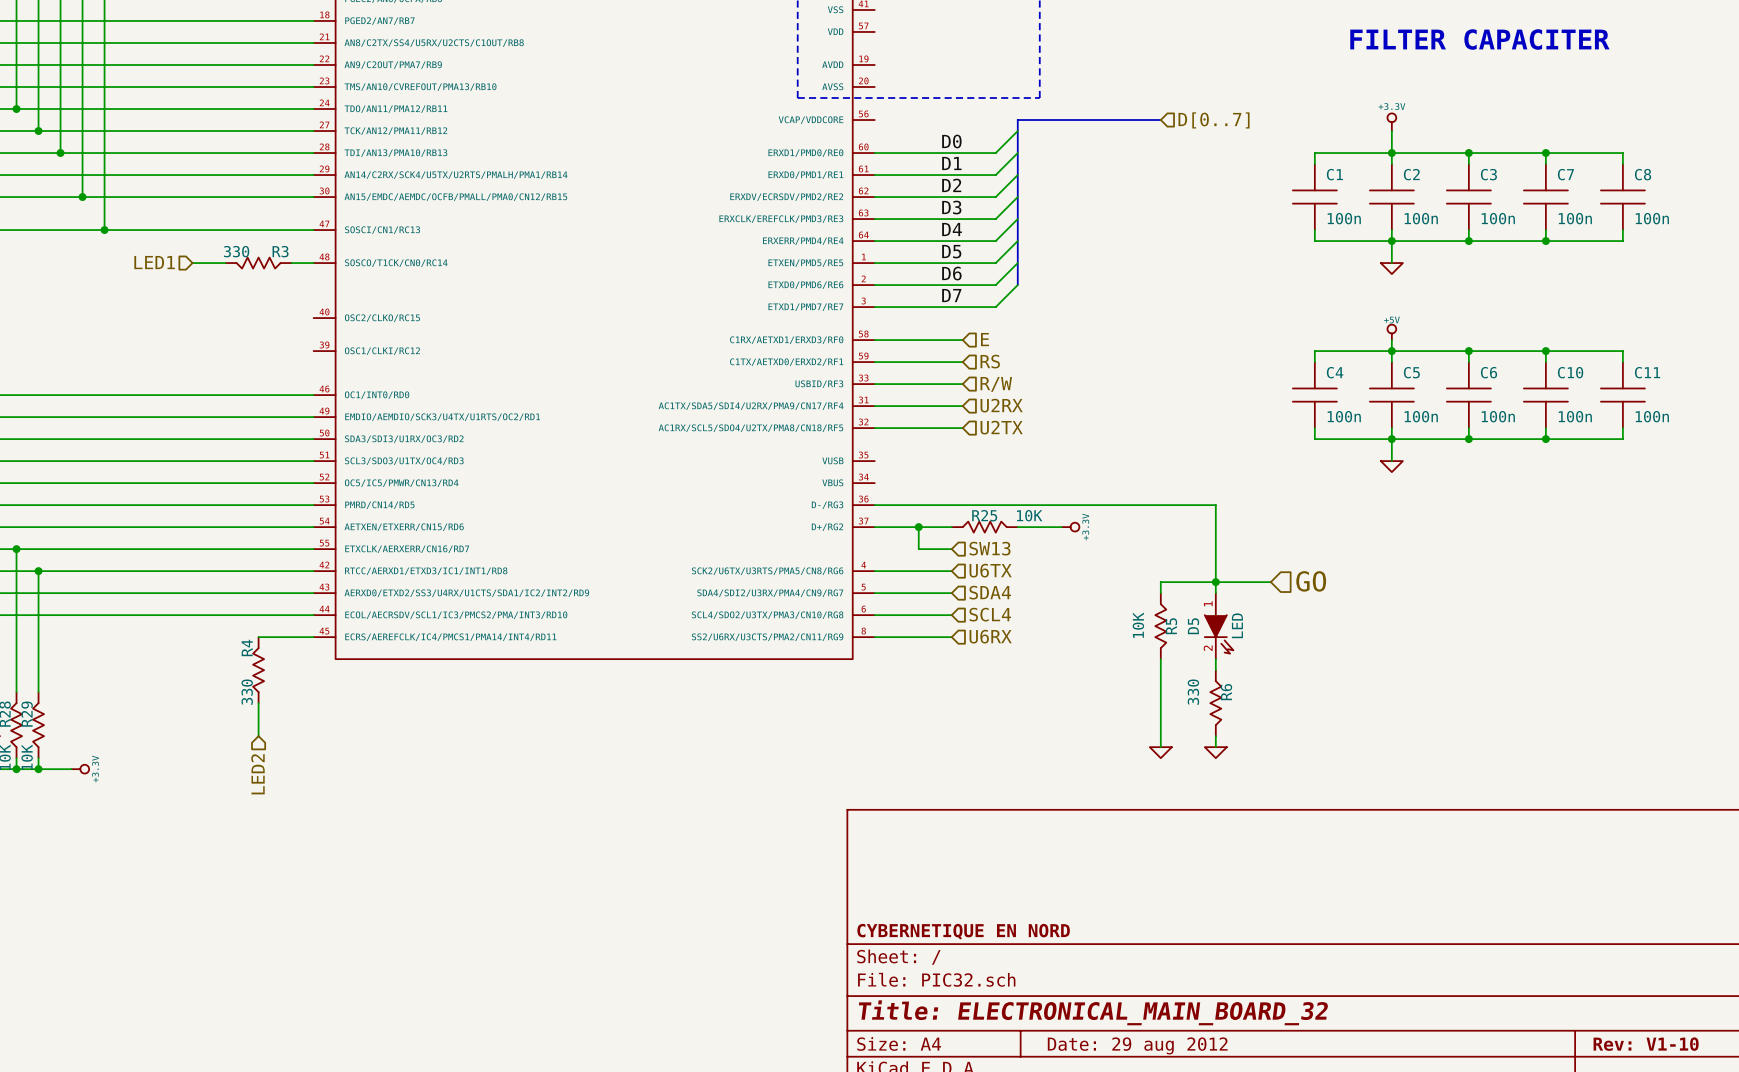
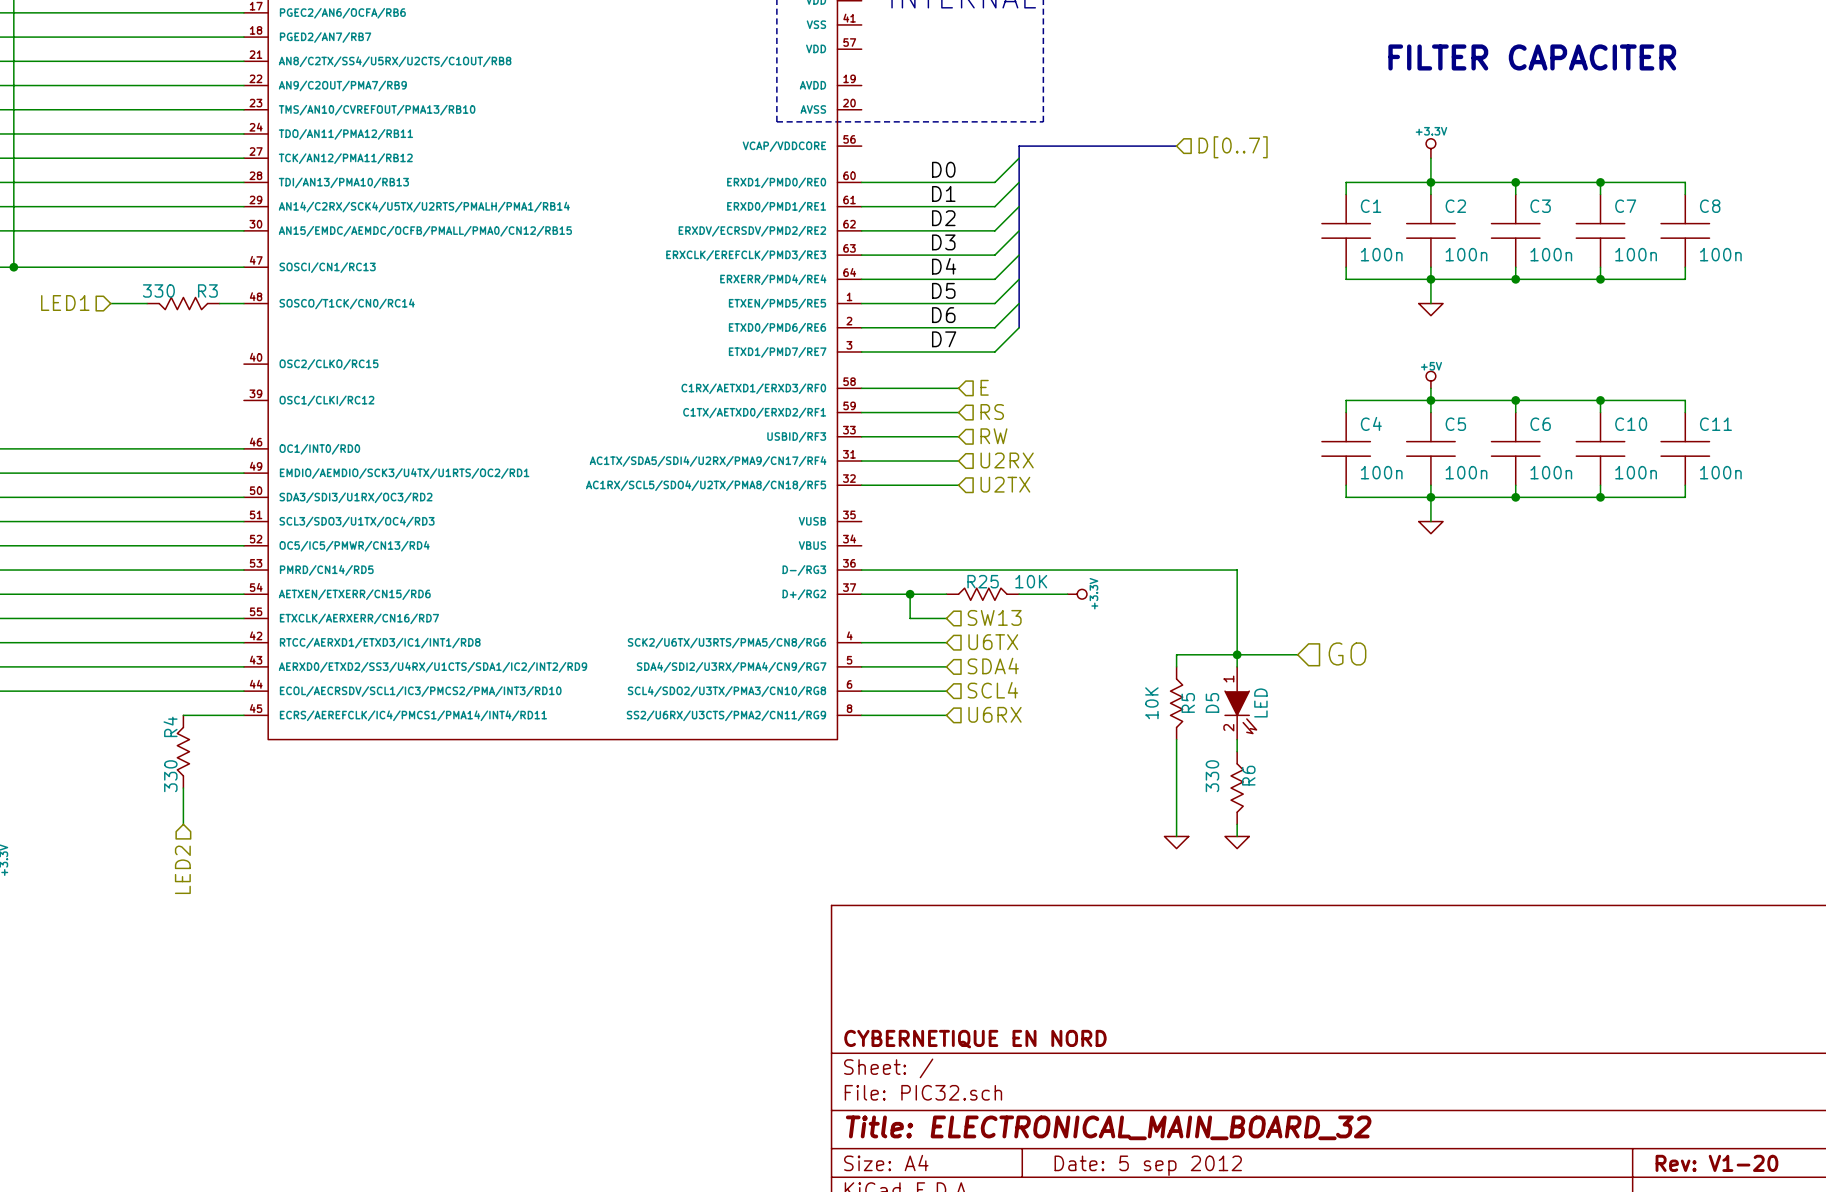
hierarchical label: R/W (996, 384) -> RW (993, 436)
title block: Rev: V1-10 (1646, 1044) -> Rev: V1-20 (1716, 1163)
title block: Date: 29 aug 2012 (1137, 1045) -> Date: 5 sep 2012 (1148, 1165)

